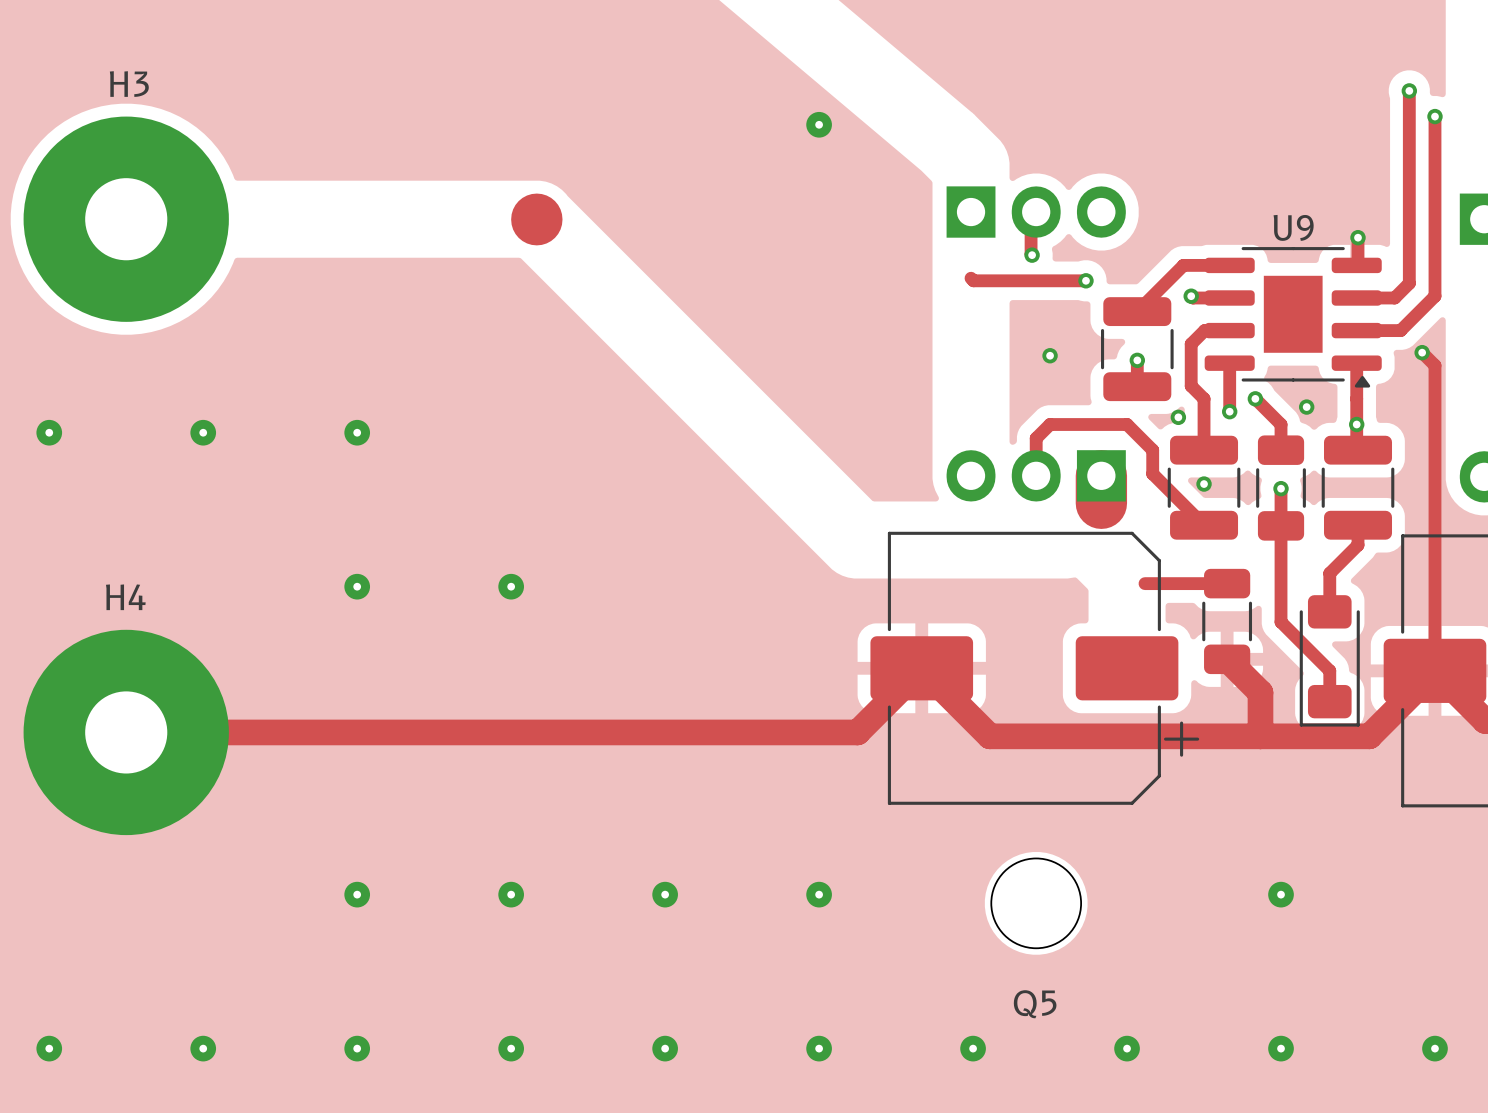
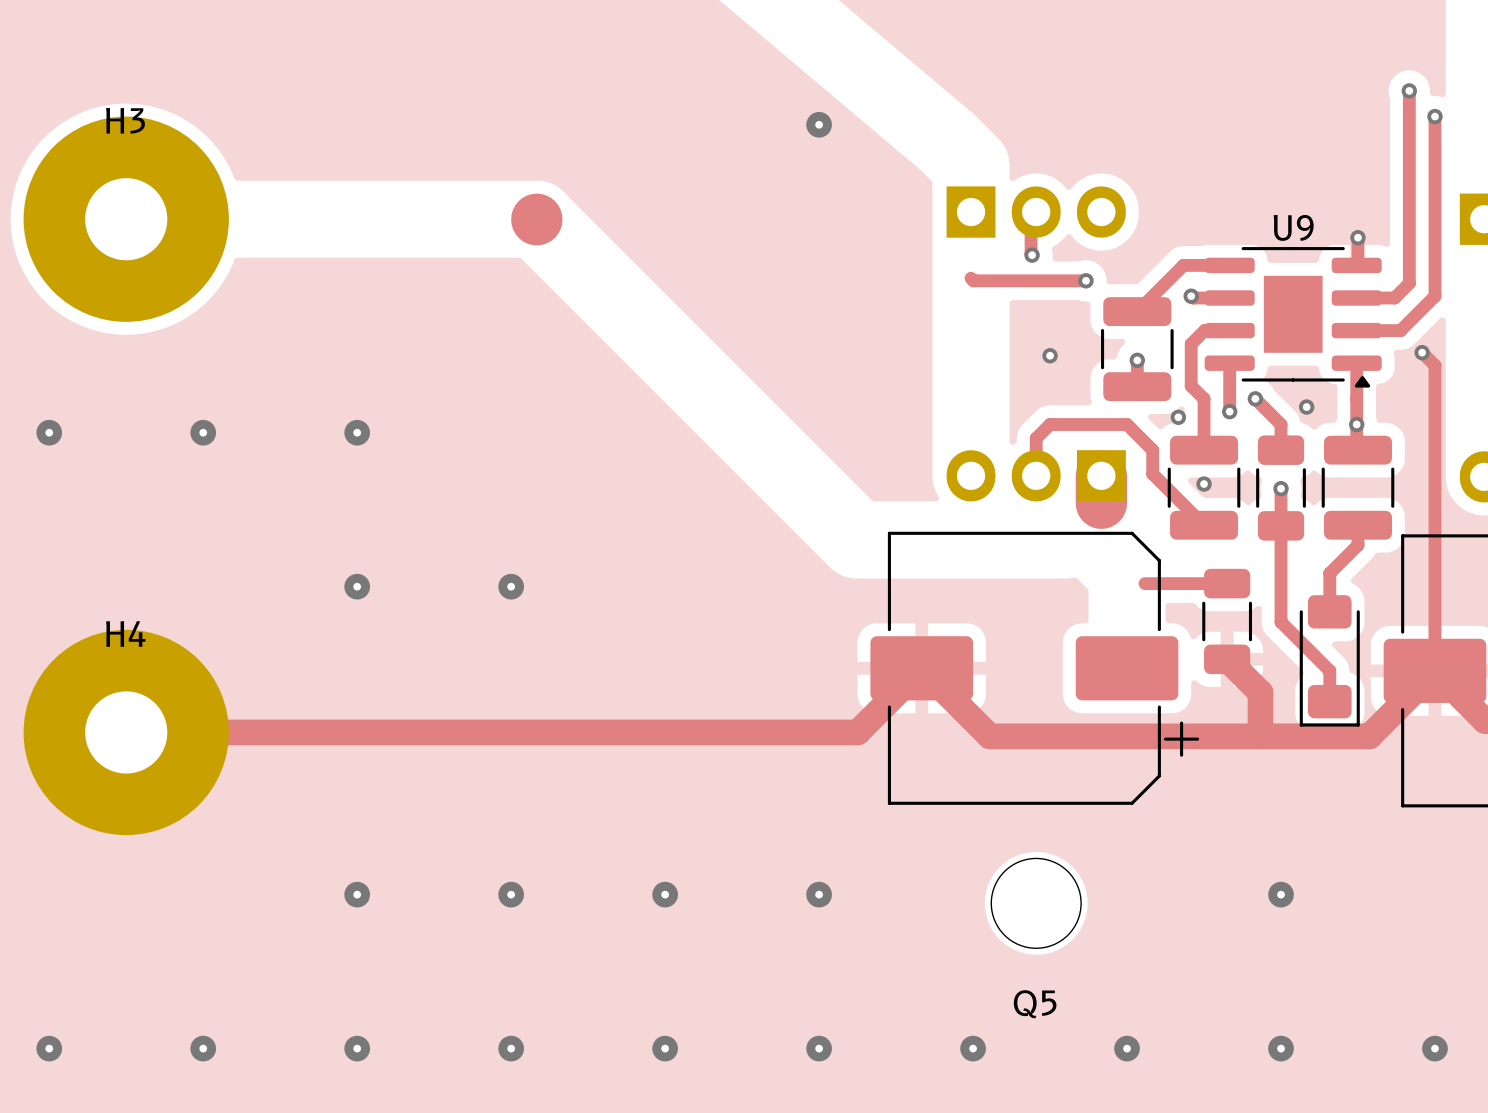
H3 name position: H3 (129, 84) -> H3 (125, 120)
H4 name position: H4 (125, 597) -> H4 (125, 633)

